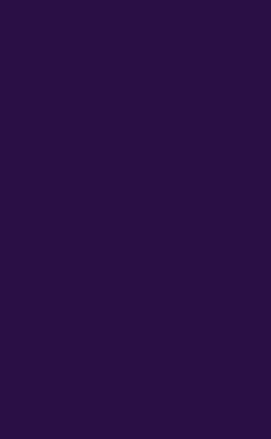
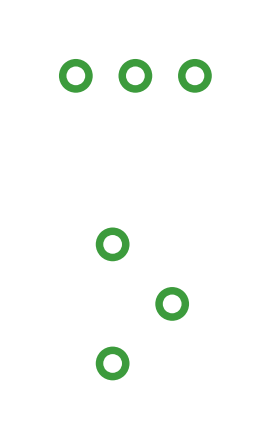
part: none -> (135, 75)
part: none -> (142, 303)

